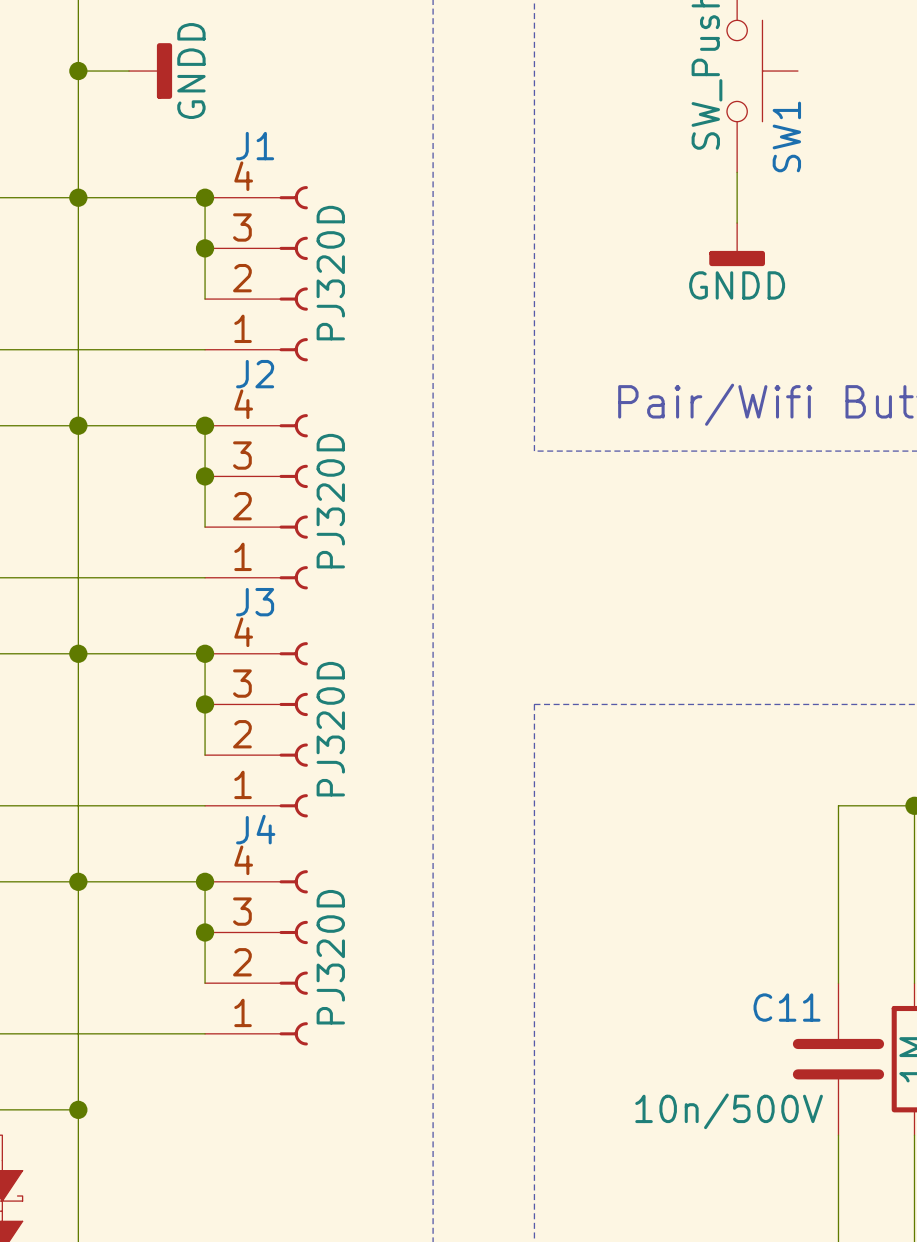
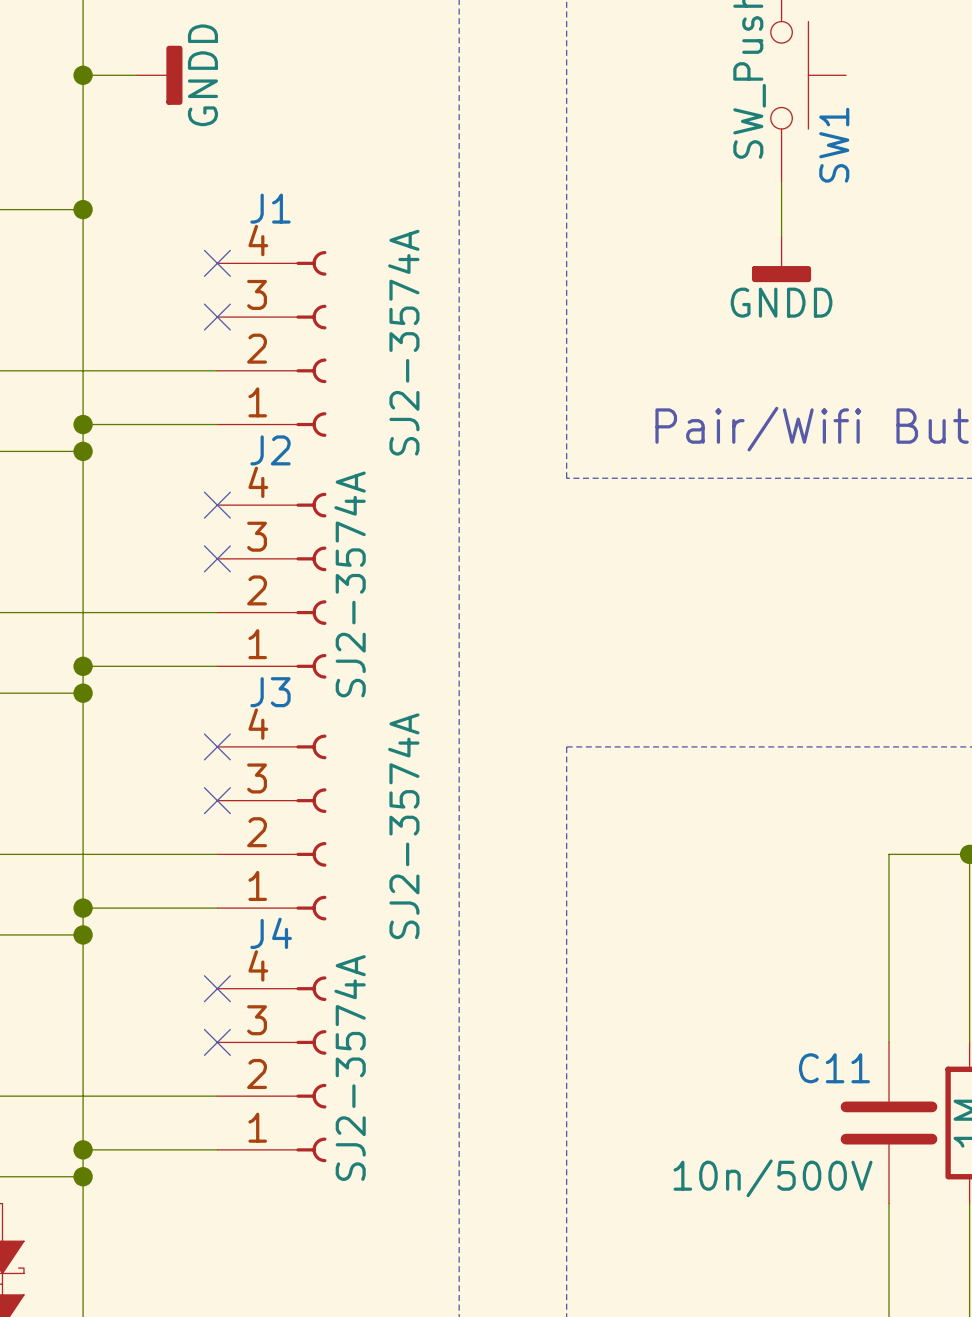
wire: (78, 197) (205, 197) (205, 299) -> none
junction: (205, 197) -> none
junction: (205, 248) -> none
no-connect mark: none -> (217, 263)
J1 position: (256, 273) -> (271, 343)
J1 value: PJ320D (330, 273) -> SJ2-3574A (403, 342)
no-connect mark: none -> (217, 317)
wire: none -> (83, 424) (217, 424)
junction: none -> (83, 424)
wire: (78, 425) (205, 425) (205, 527) -> none
junction: (205, 425) -> none
junction: (205, 476) -> none
no-connect mark: none -> (217, 505)
J2 position: (256, 501) -> (271, 585)
J2 value: PJ320D (330, 501) -> SJ2-3574A (350, 584)
no-connect mark: none -> (217, 558)
wire: none -> (83, 666) (217, 666)
junction: none -> (83, 666)
wire: (78, 653) (205, 653) (205, 755) -> none
junction: (205, 653) -> none
junction: (205, 704) -> none
no-connect mark: none -> (217, 746)
J3 position: (256, 729) -> (271, 827)
J3 value: PJ320D (330, 729) -> SJ2-3574A (403, 826)
no-connect mark: none -> (217, 800)
wire: none -> (83, 908) (217, 908)
junction: none -> (83, 908)
wire: (78, 881) (205, 881) (205, 983) -> none
junction: (205, 881) -> none
junction: (205, 932) -> none
no-connect mark: none -> (217, 988)
J4 position: (256, 957) -> (271, 1069)
J4 value: PJ320D (330, 957) -> SJ2-3574A (350, 1068)
no-connect mark: none -> (217, 1042)
wire: none -> (83, 1149) (217, 1149)
junction: none -> (83, 1149)

